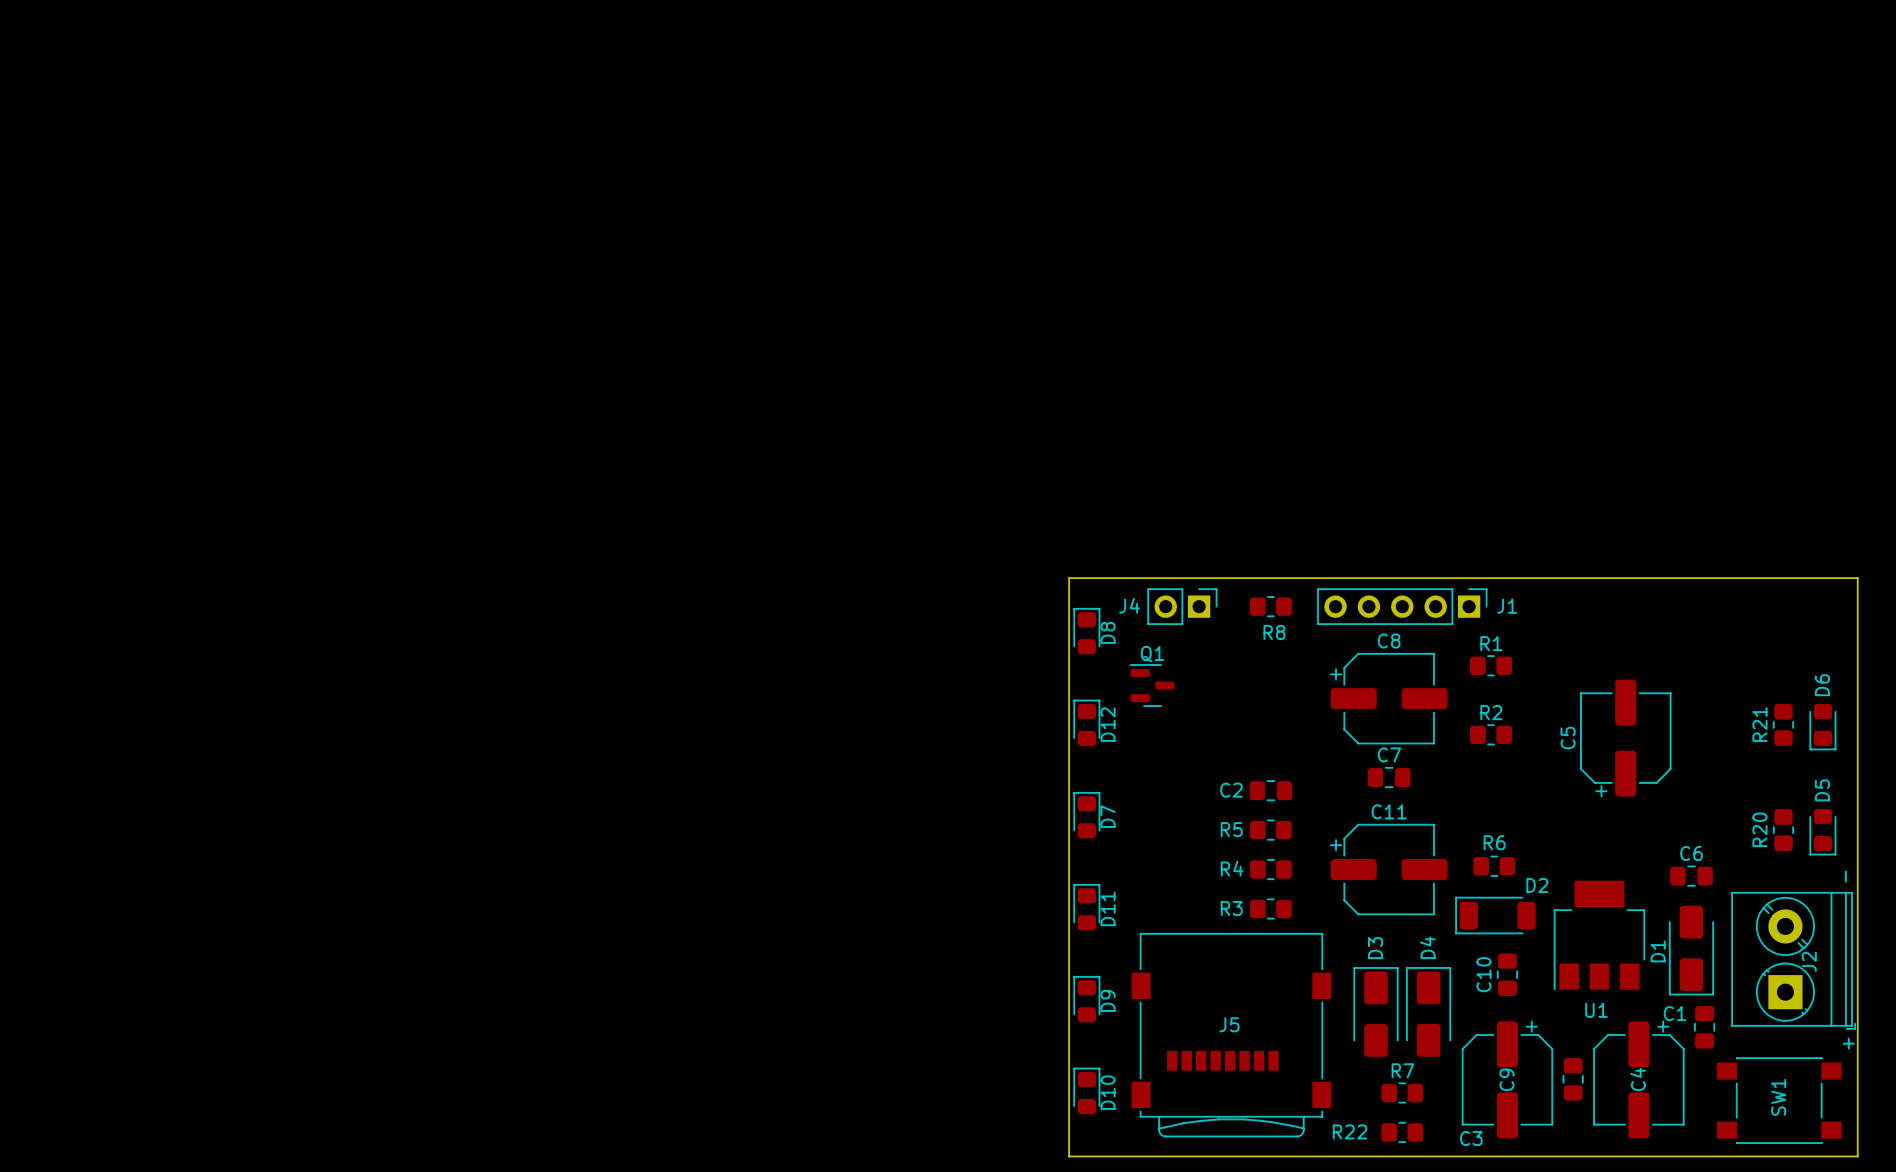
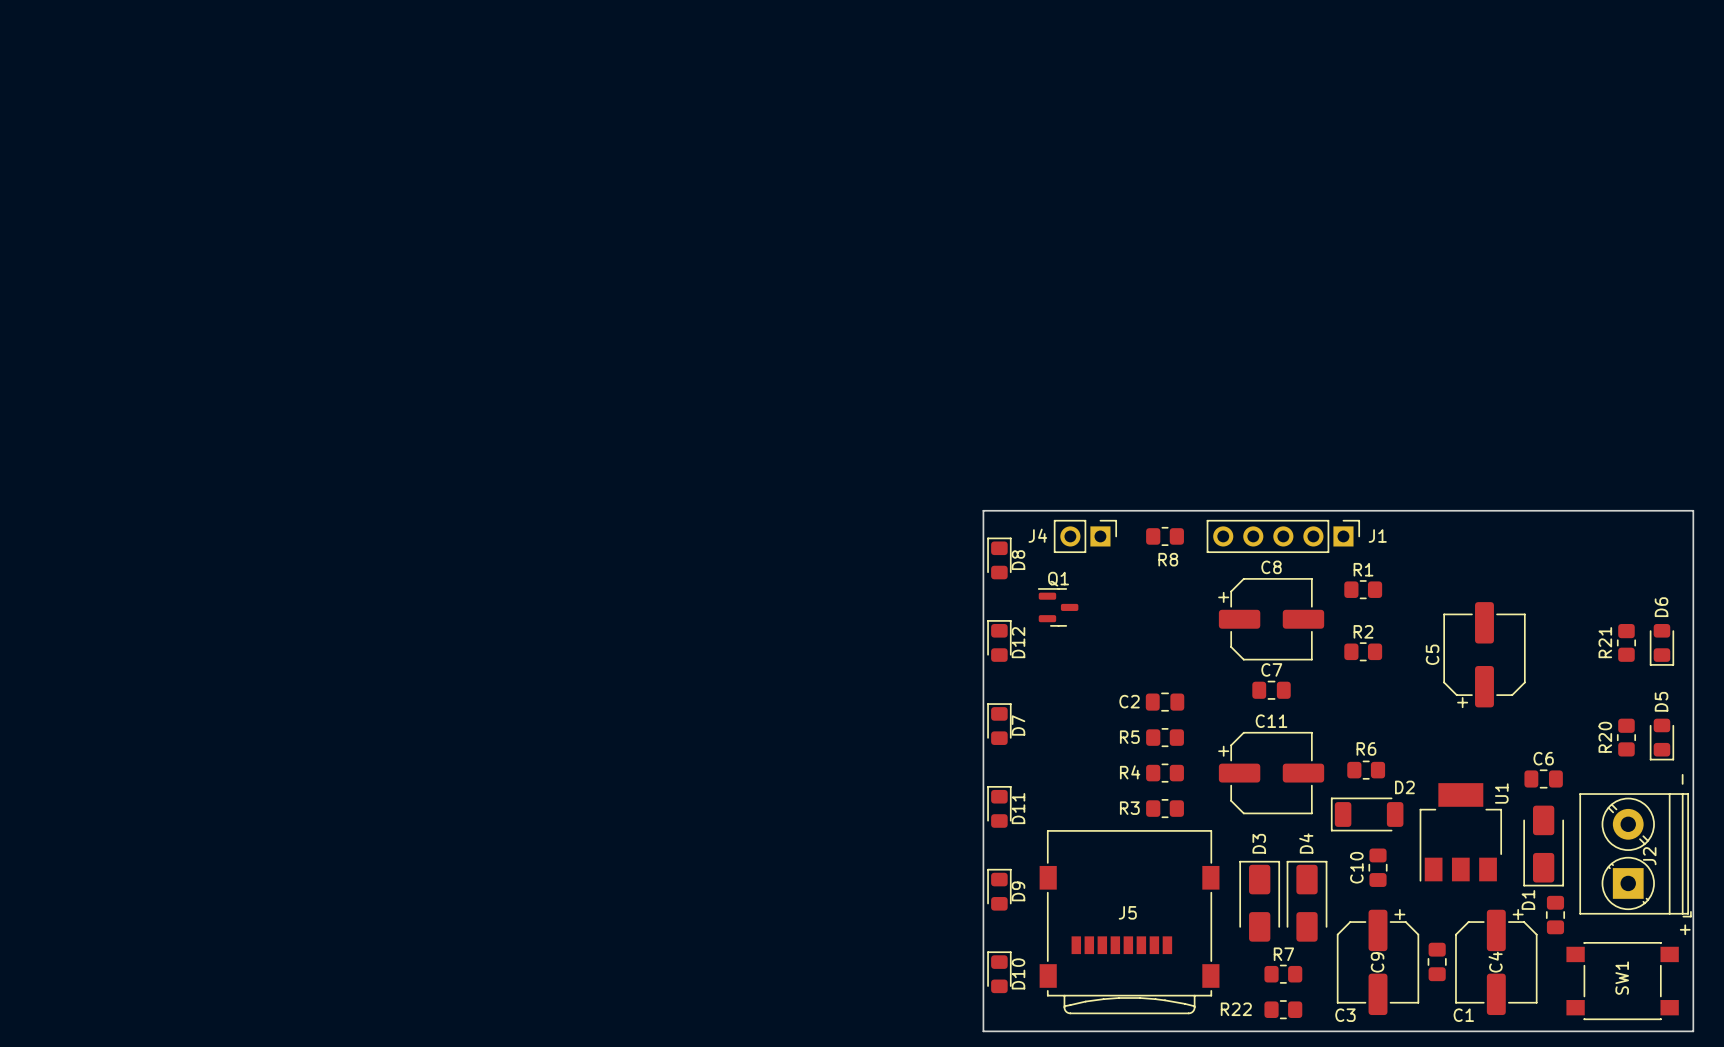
D1 name position: D1 (1658, 951) -> D1 (1528, 899)
U1 name rotation: 0° (1596, 1010) -> 90° counterclockwise (1501, 793)
U1 name position: U1 (1596, 1010) -> U1 (1501, 793)
C1 name position: C1 (1675, 1013) -> C1 (1463, 1015)

